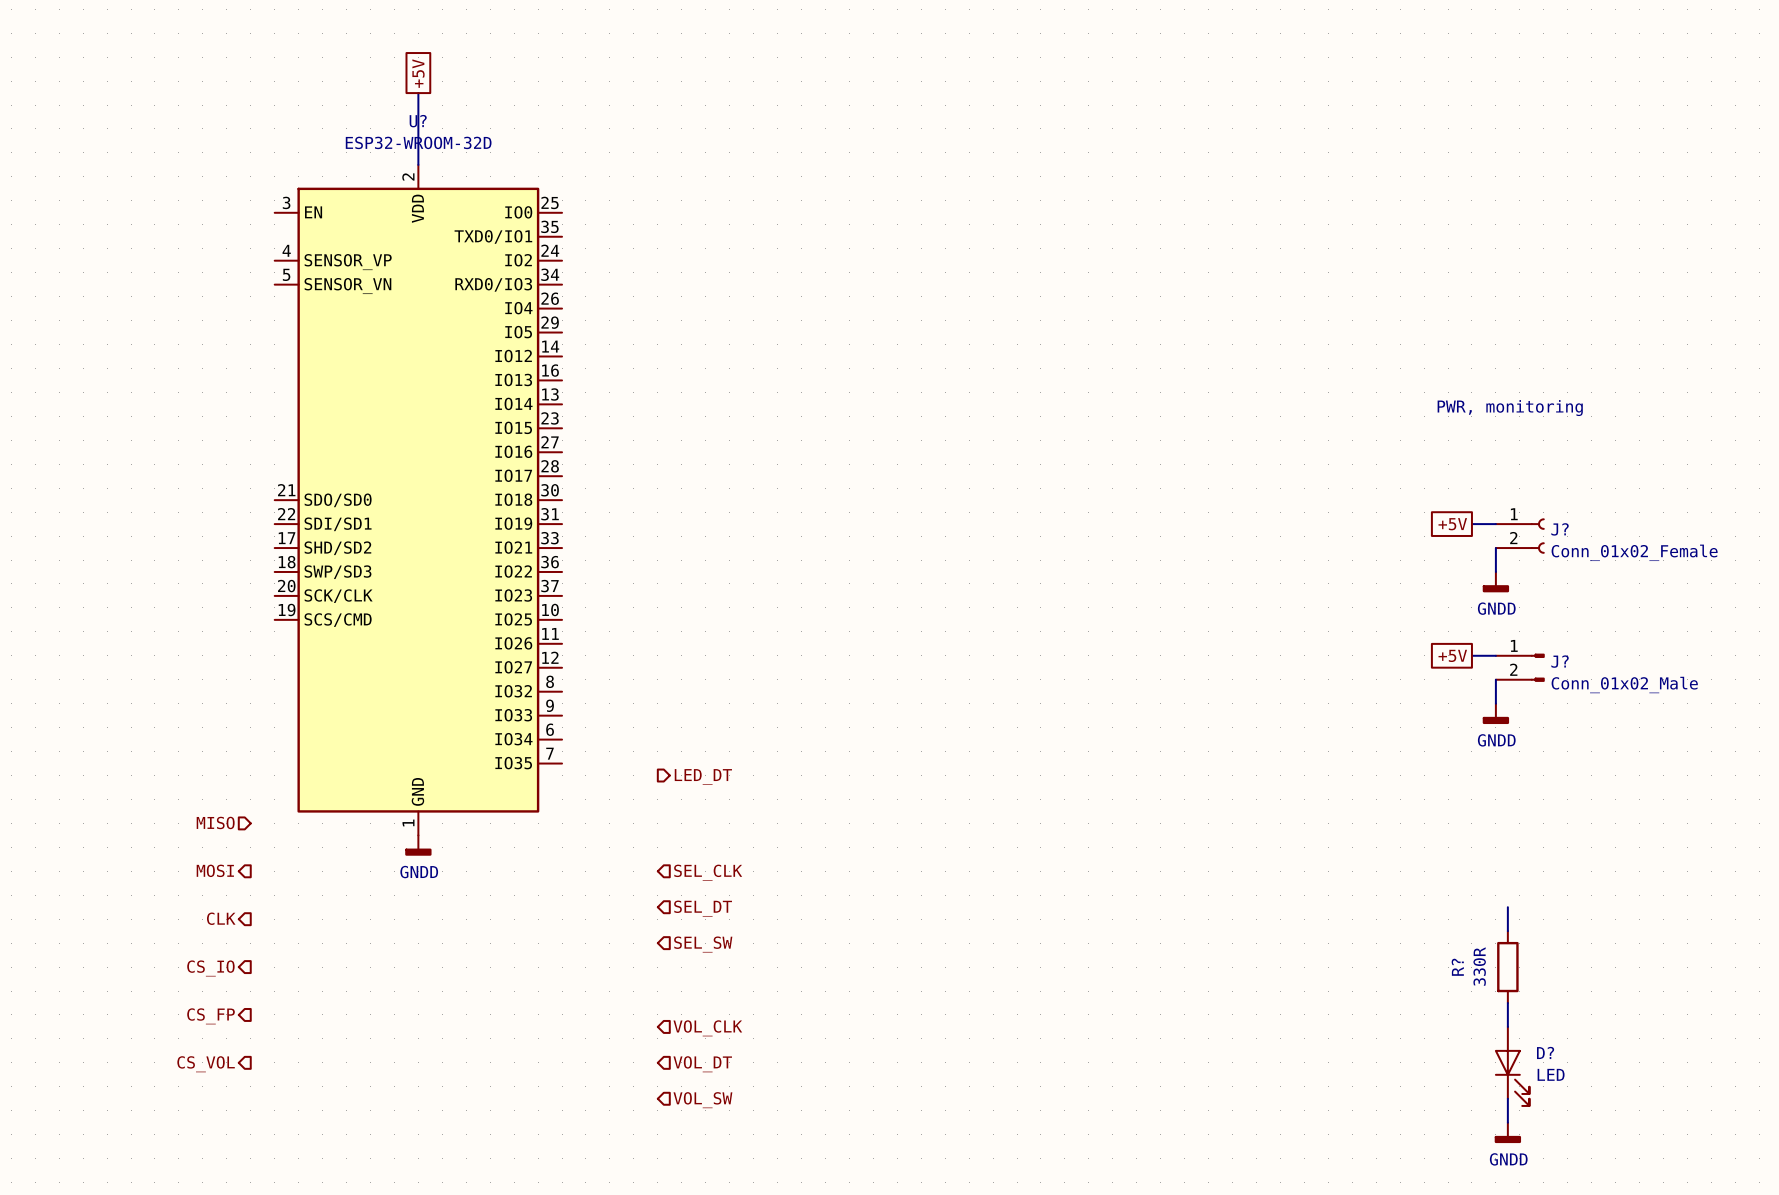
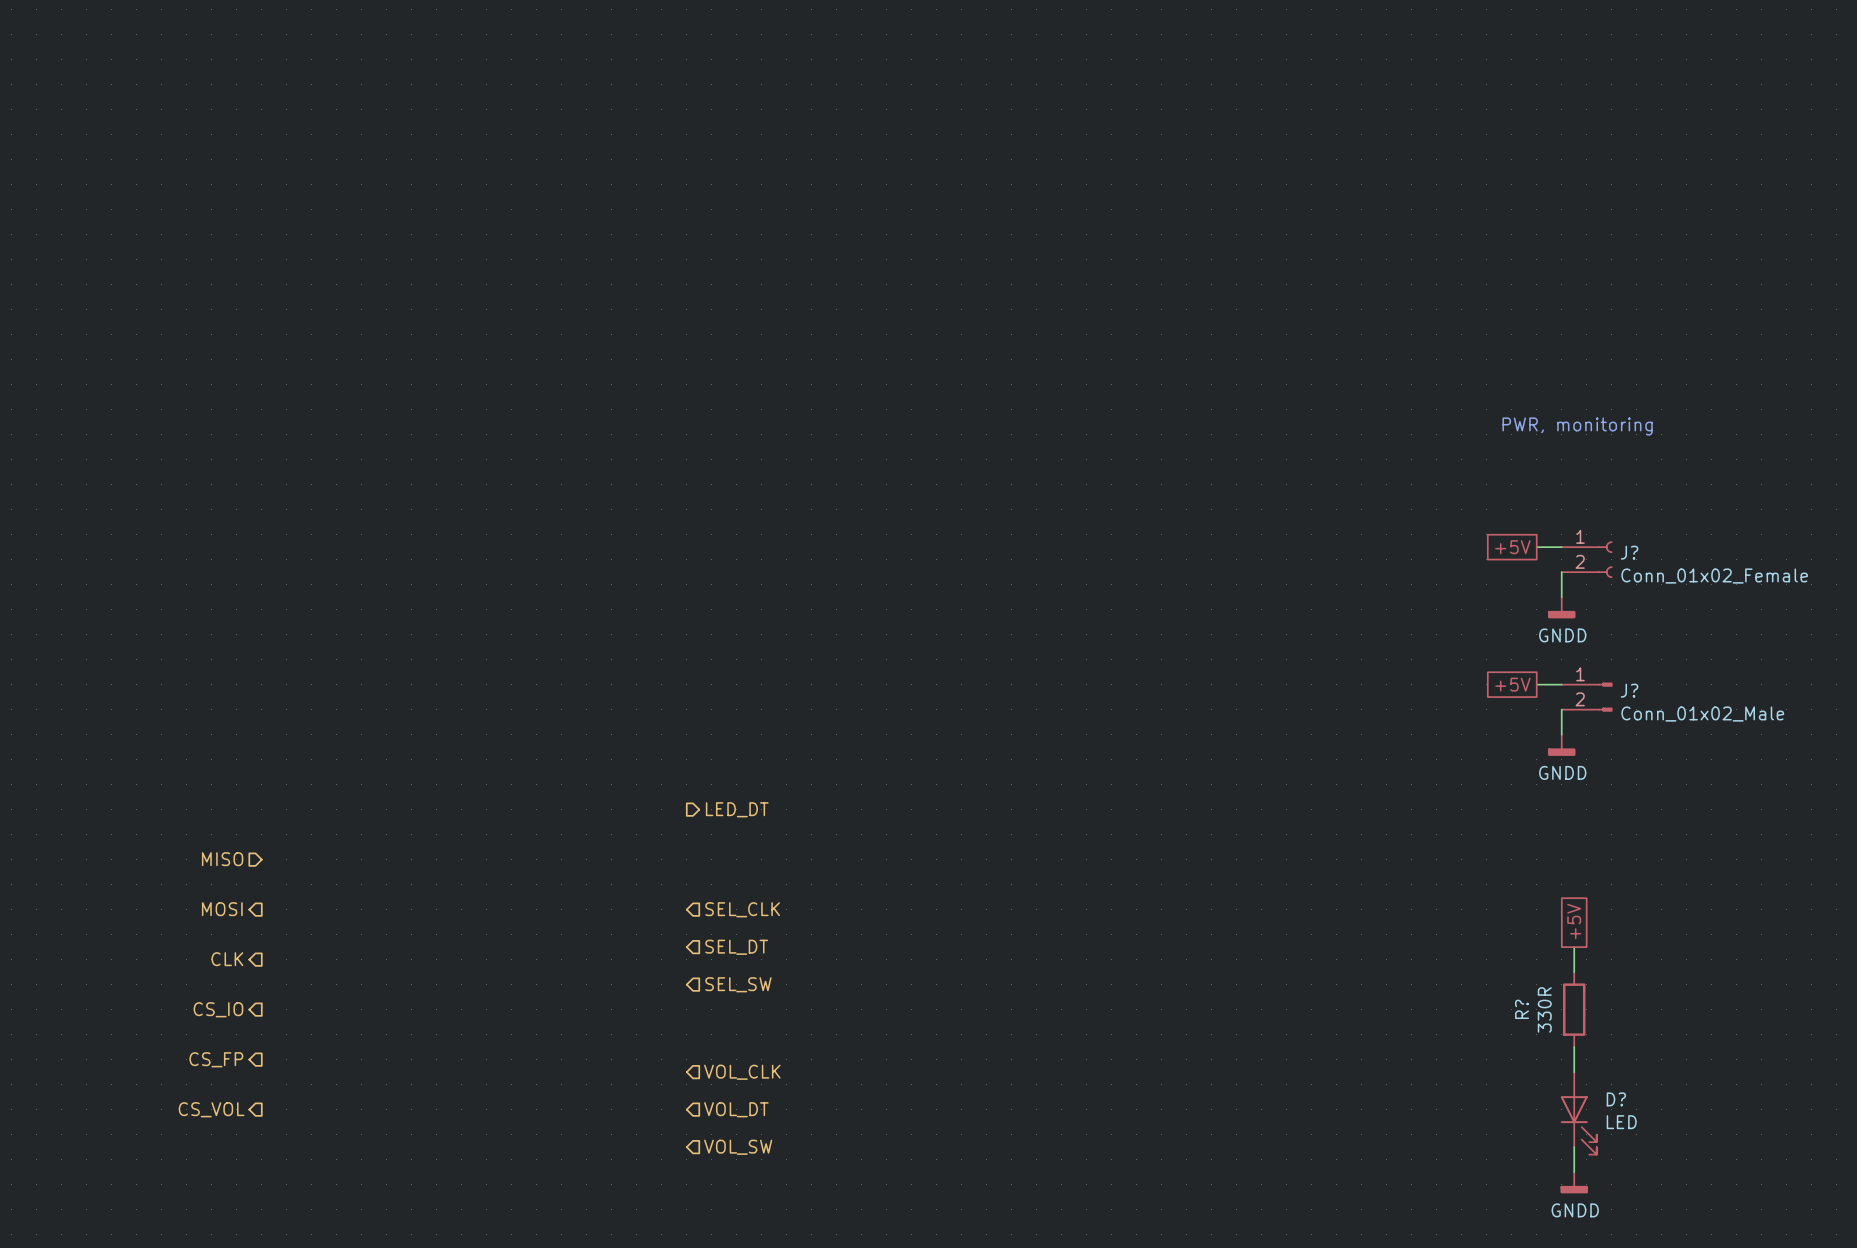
global label: +5V (418, 73) -> none
wire: (418, 93) (418, 164) -> none
U?: ESP32-WROOM-32D (418, 500) -> none
power symbol: GNDD (418, 845) -> none
global label: none -> +5V (1574, 921)

